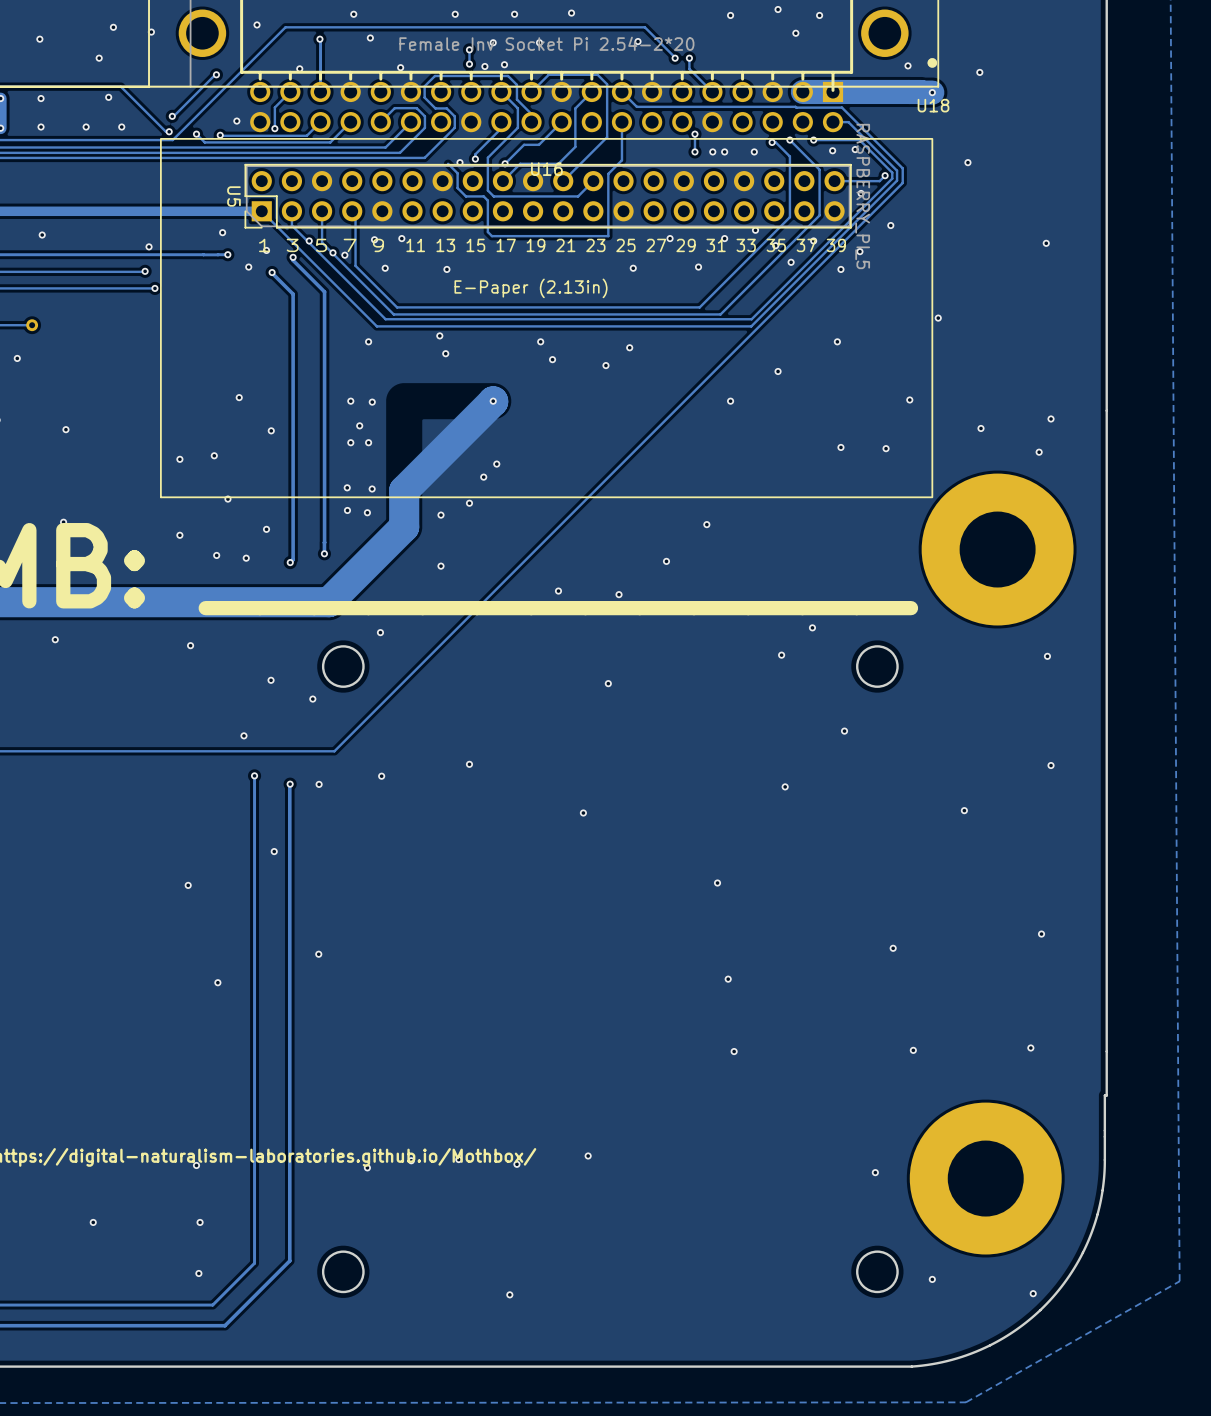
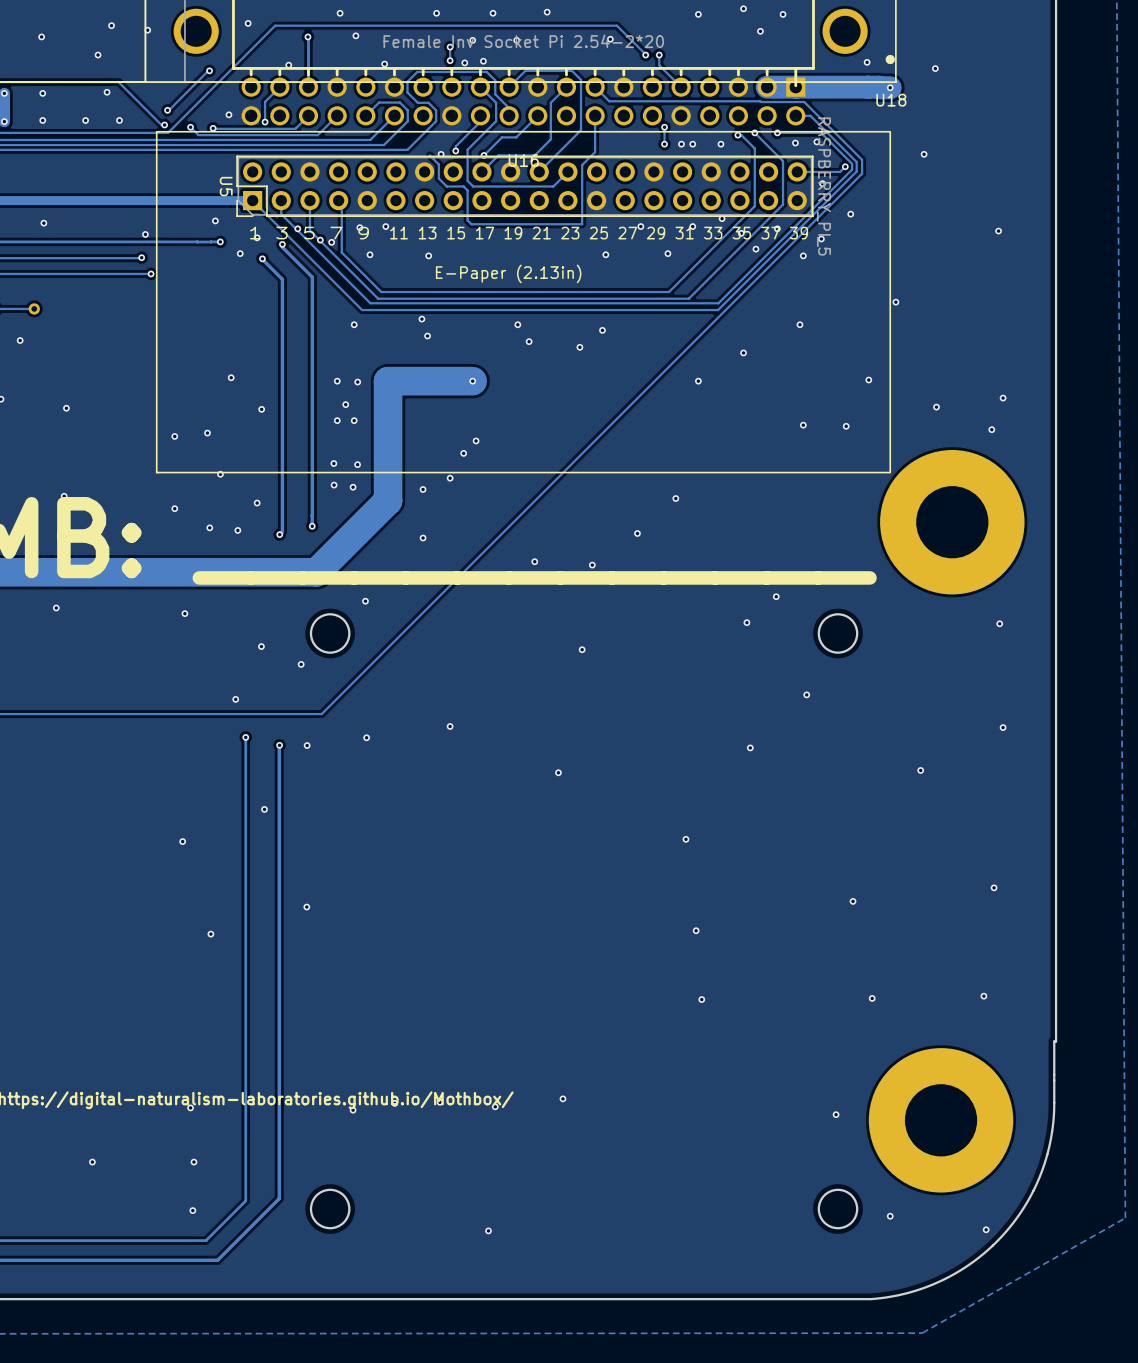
track: (493, 401) (404, 490) -> (472, 381) (388, 381) (388, 466)

